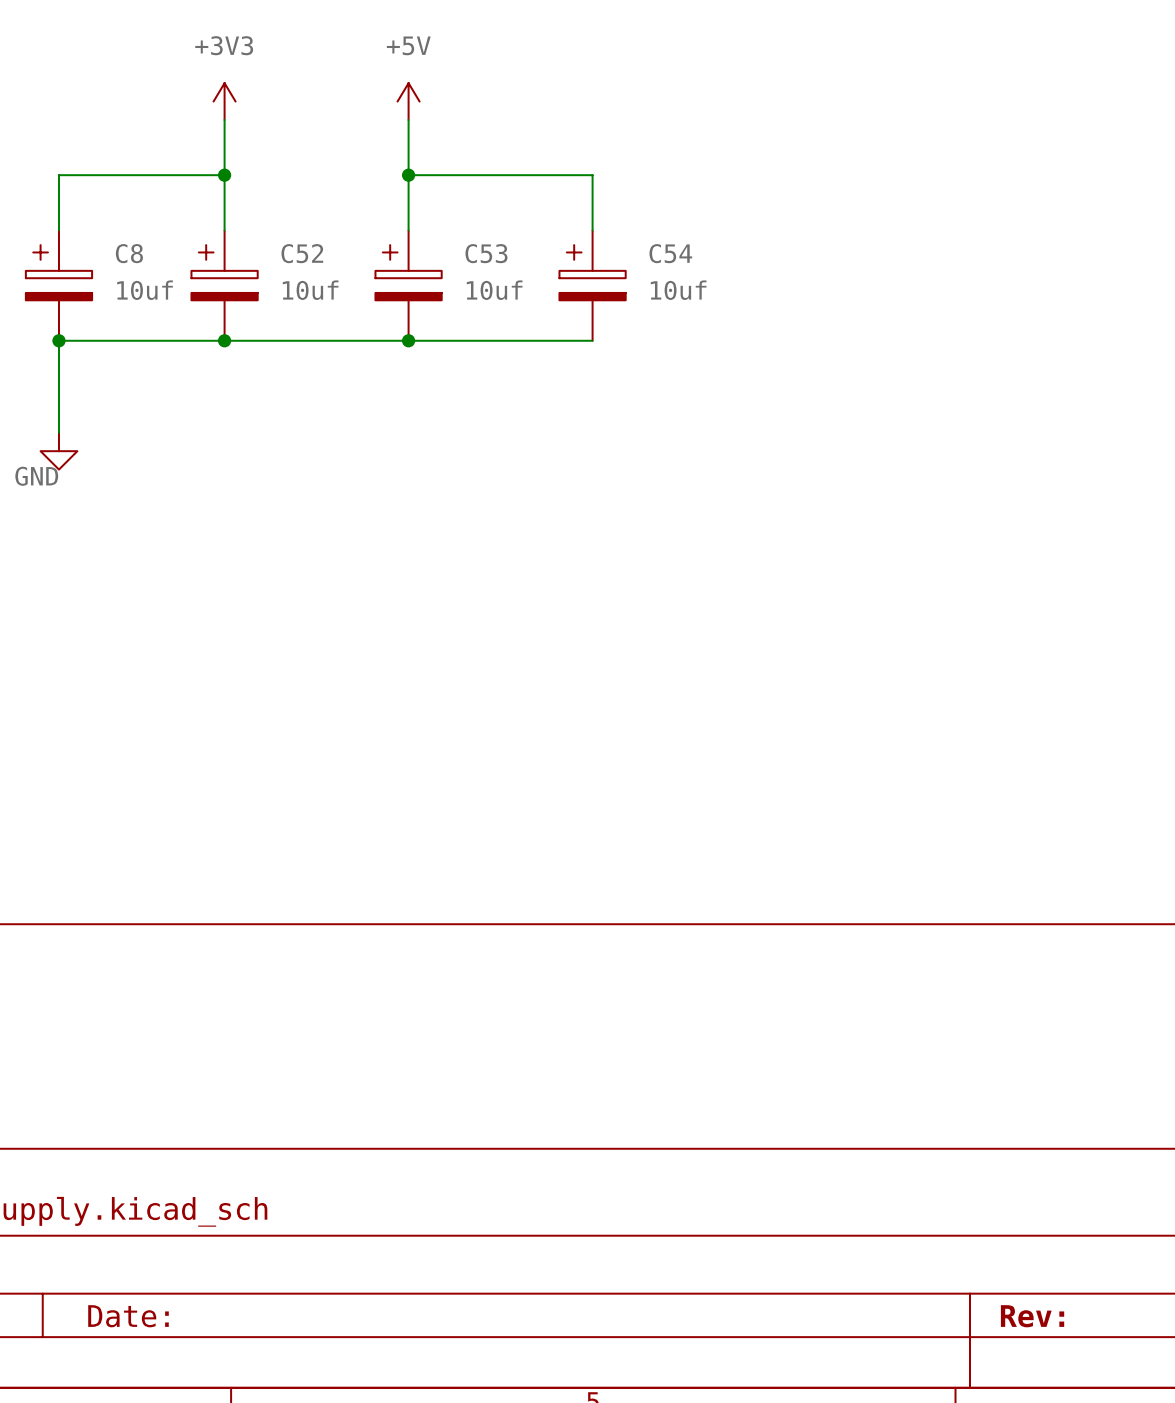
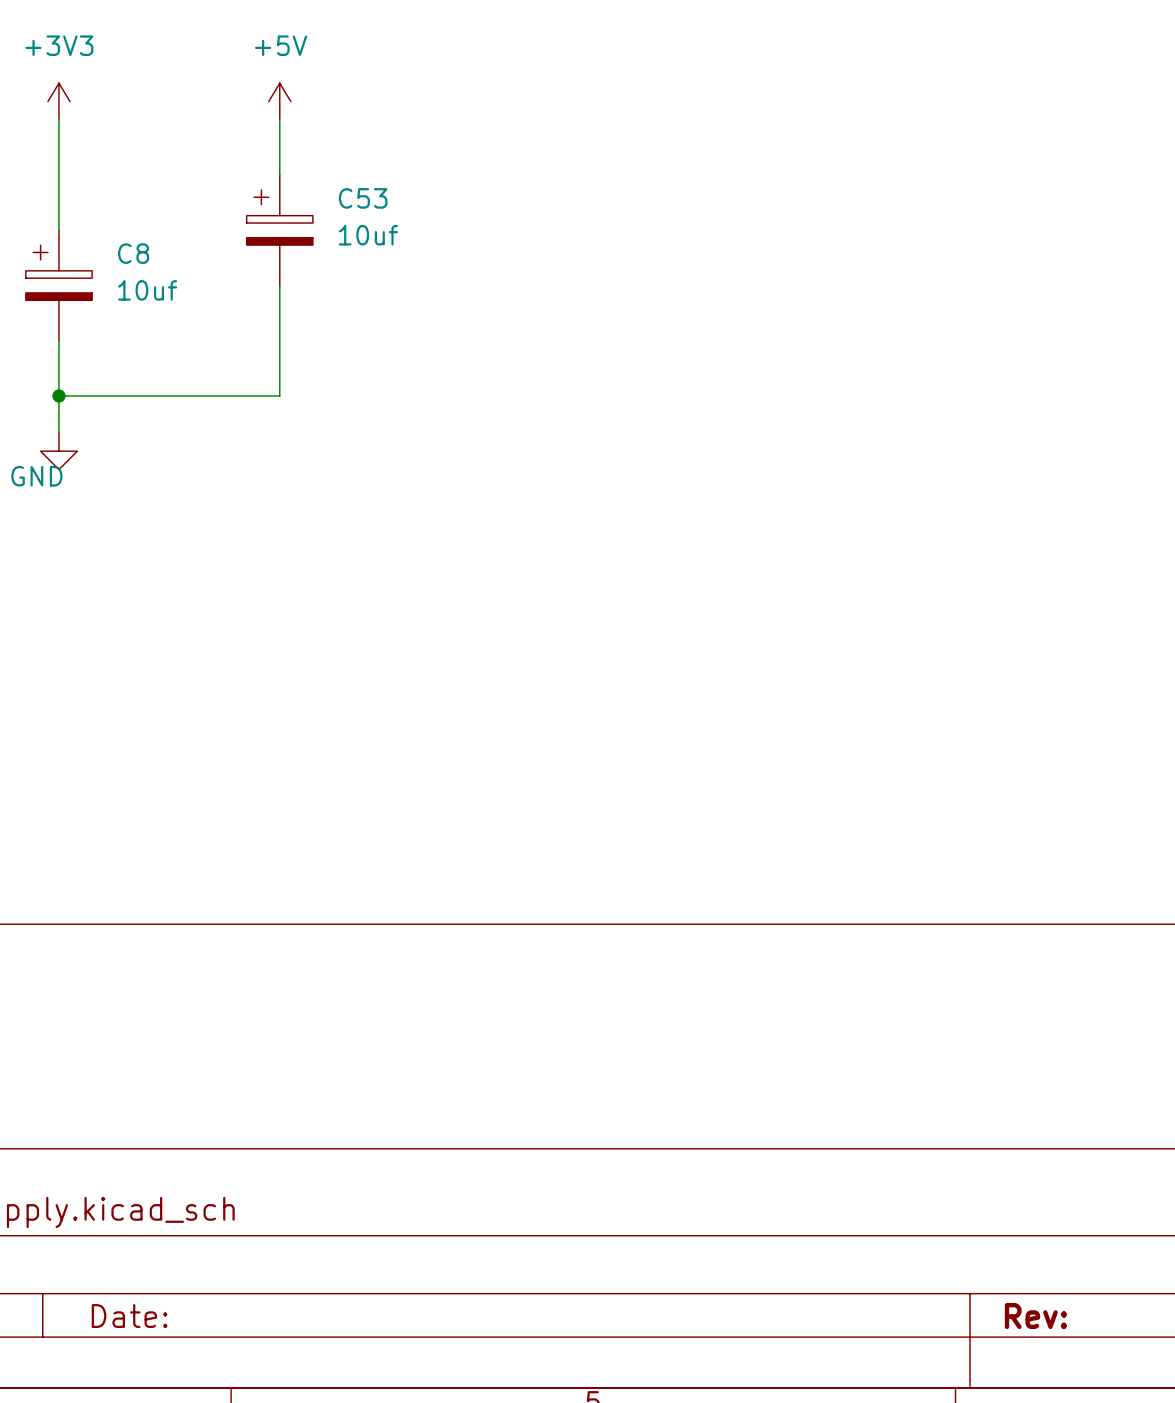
power symbol position: +3V3 (224, 101) -> +3V3 (58, 101)
power symbol position: +5V (408, 101) -> +5V (279, 101)
wire: (224, 119) (224, 230) -> none
wire: none -> (279, 119) (279, 175)
wire: (408, 119) (408, 230) -> none
wire: (58, 175) (224, 175) -> (58, 175) (58, 119)
junction: (224, 175) -> none
wire: (408, 175) (592, 175) (592, 230) -> none
junction: (408, 175) -> none
C52: 10uf (224, 285) -> none
wire: none -> (279, 285) (279, 395) (58, 395)
C53 position: (408, 285) -> (279, 230)
C54: 10uf (592, 285) -> none
wire: (58, 340) (592, 340) -> none
junction position: (58, 340) -> (58, 395)
junction: (224, 340) -> none
junction: (408, 340) -> none

